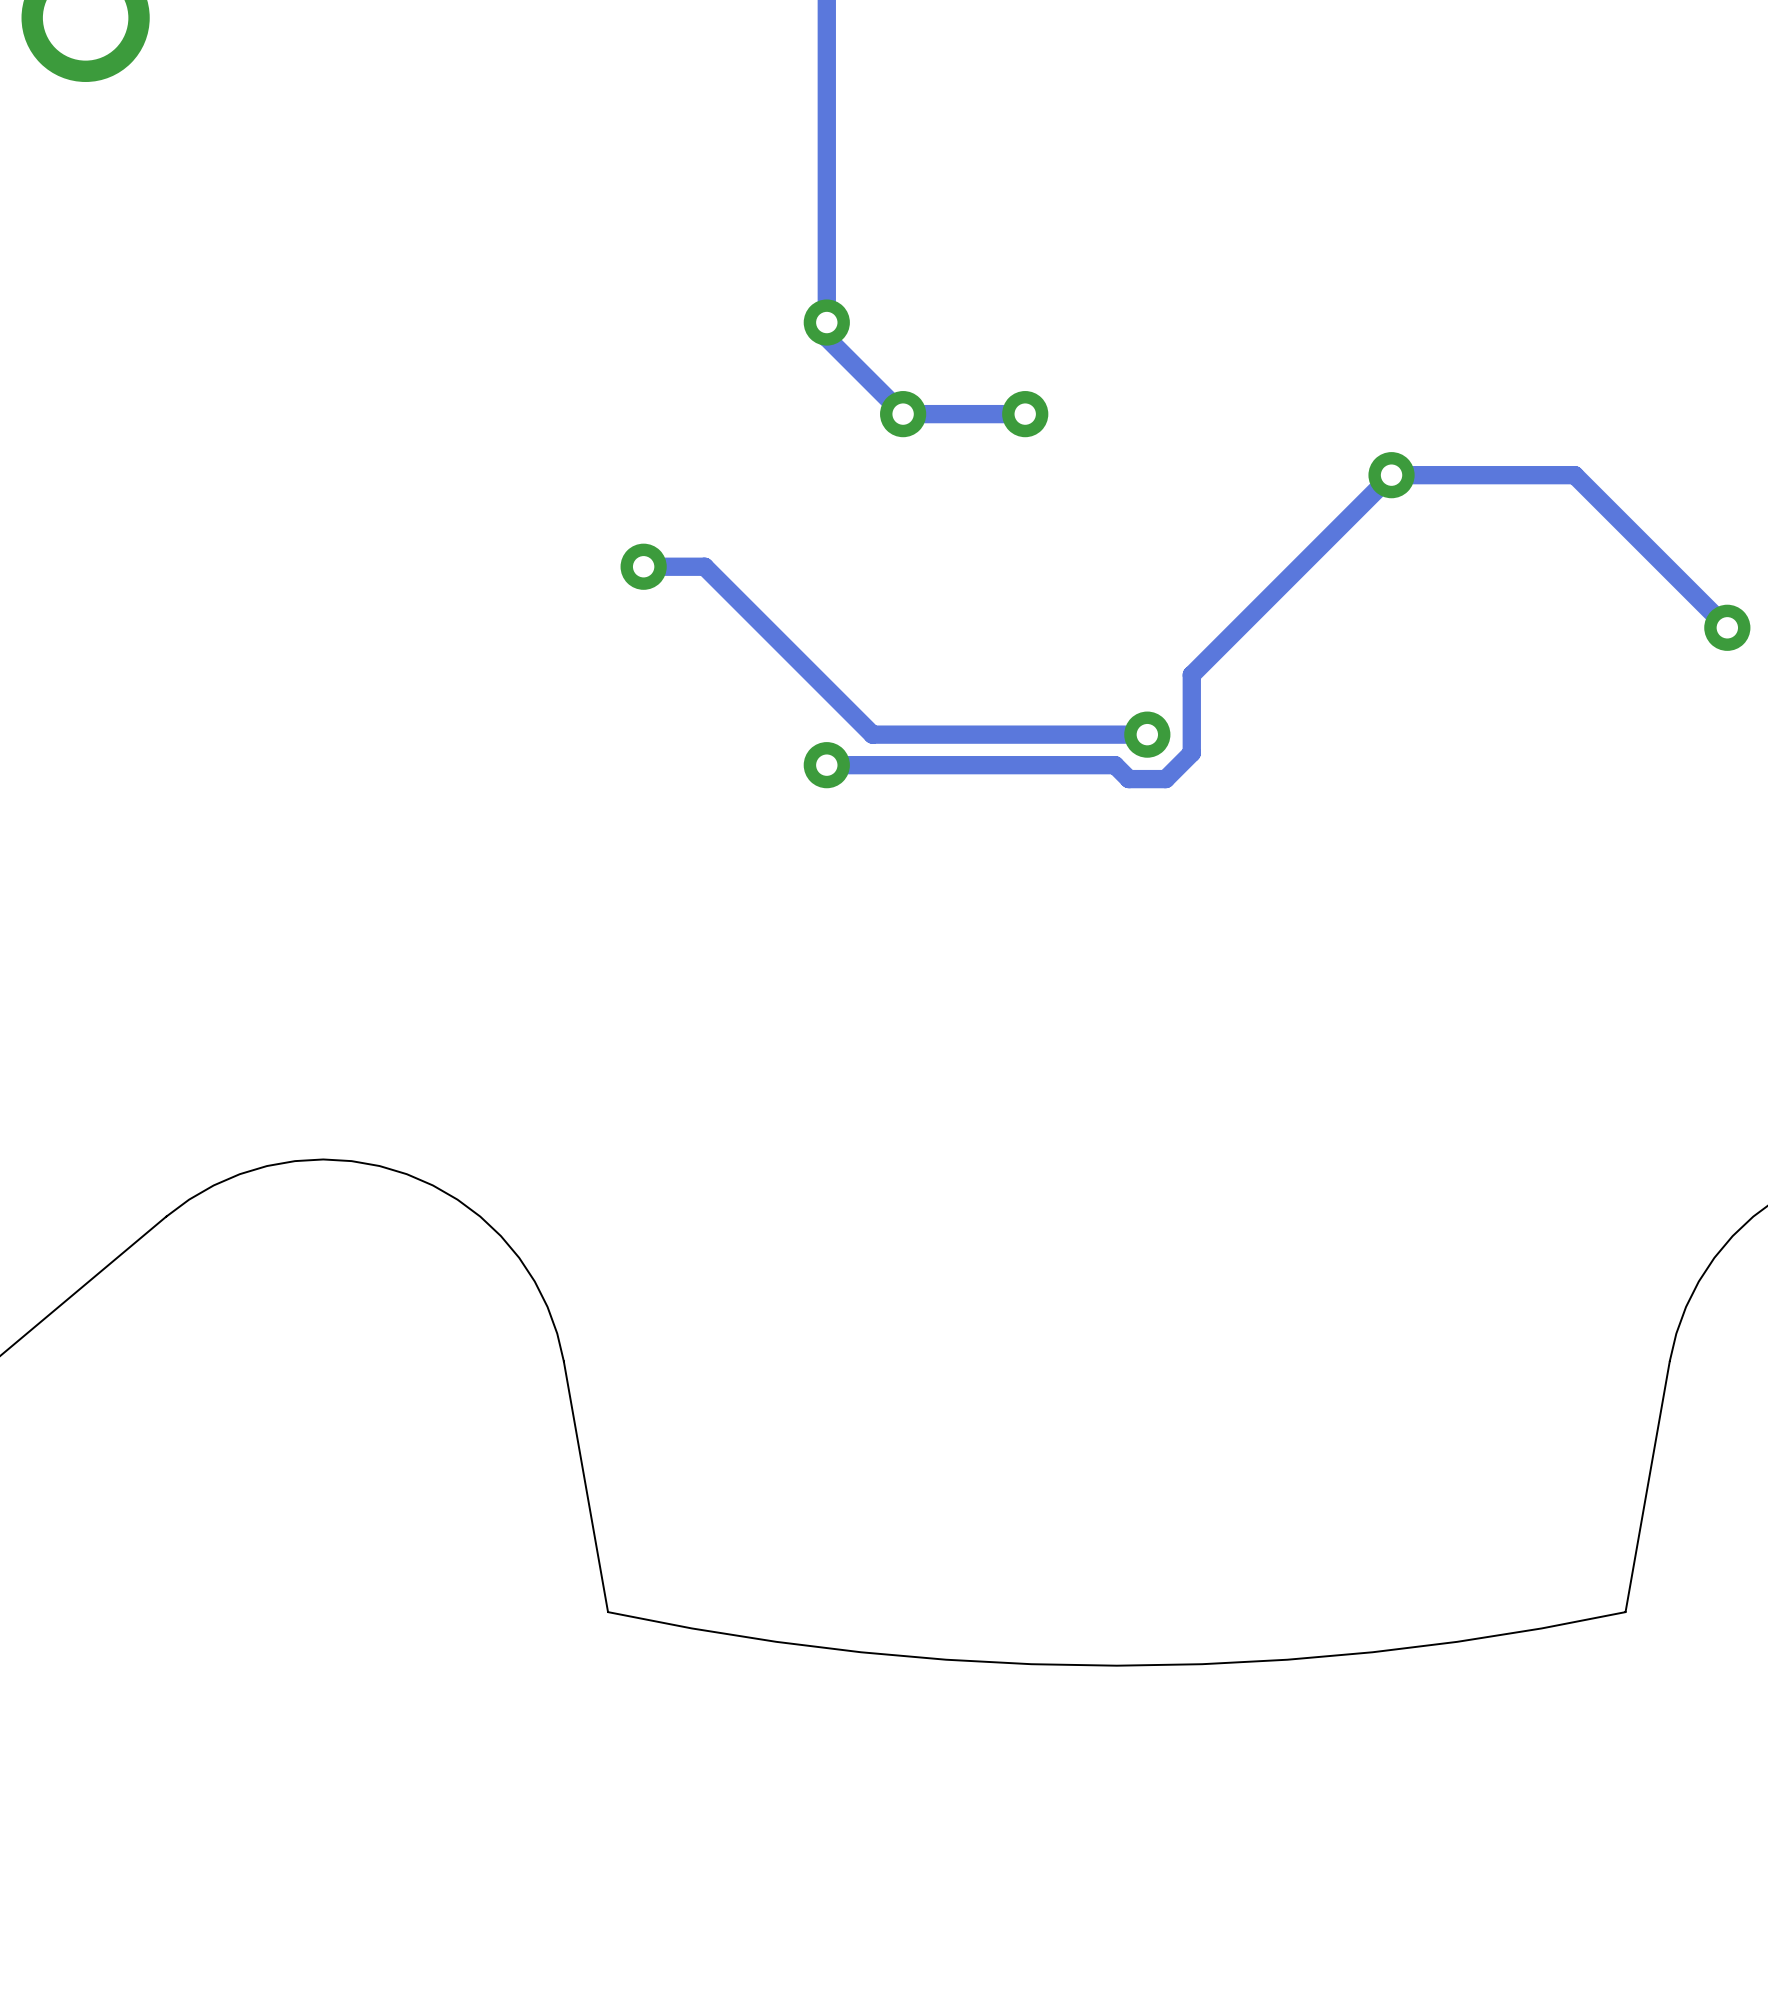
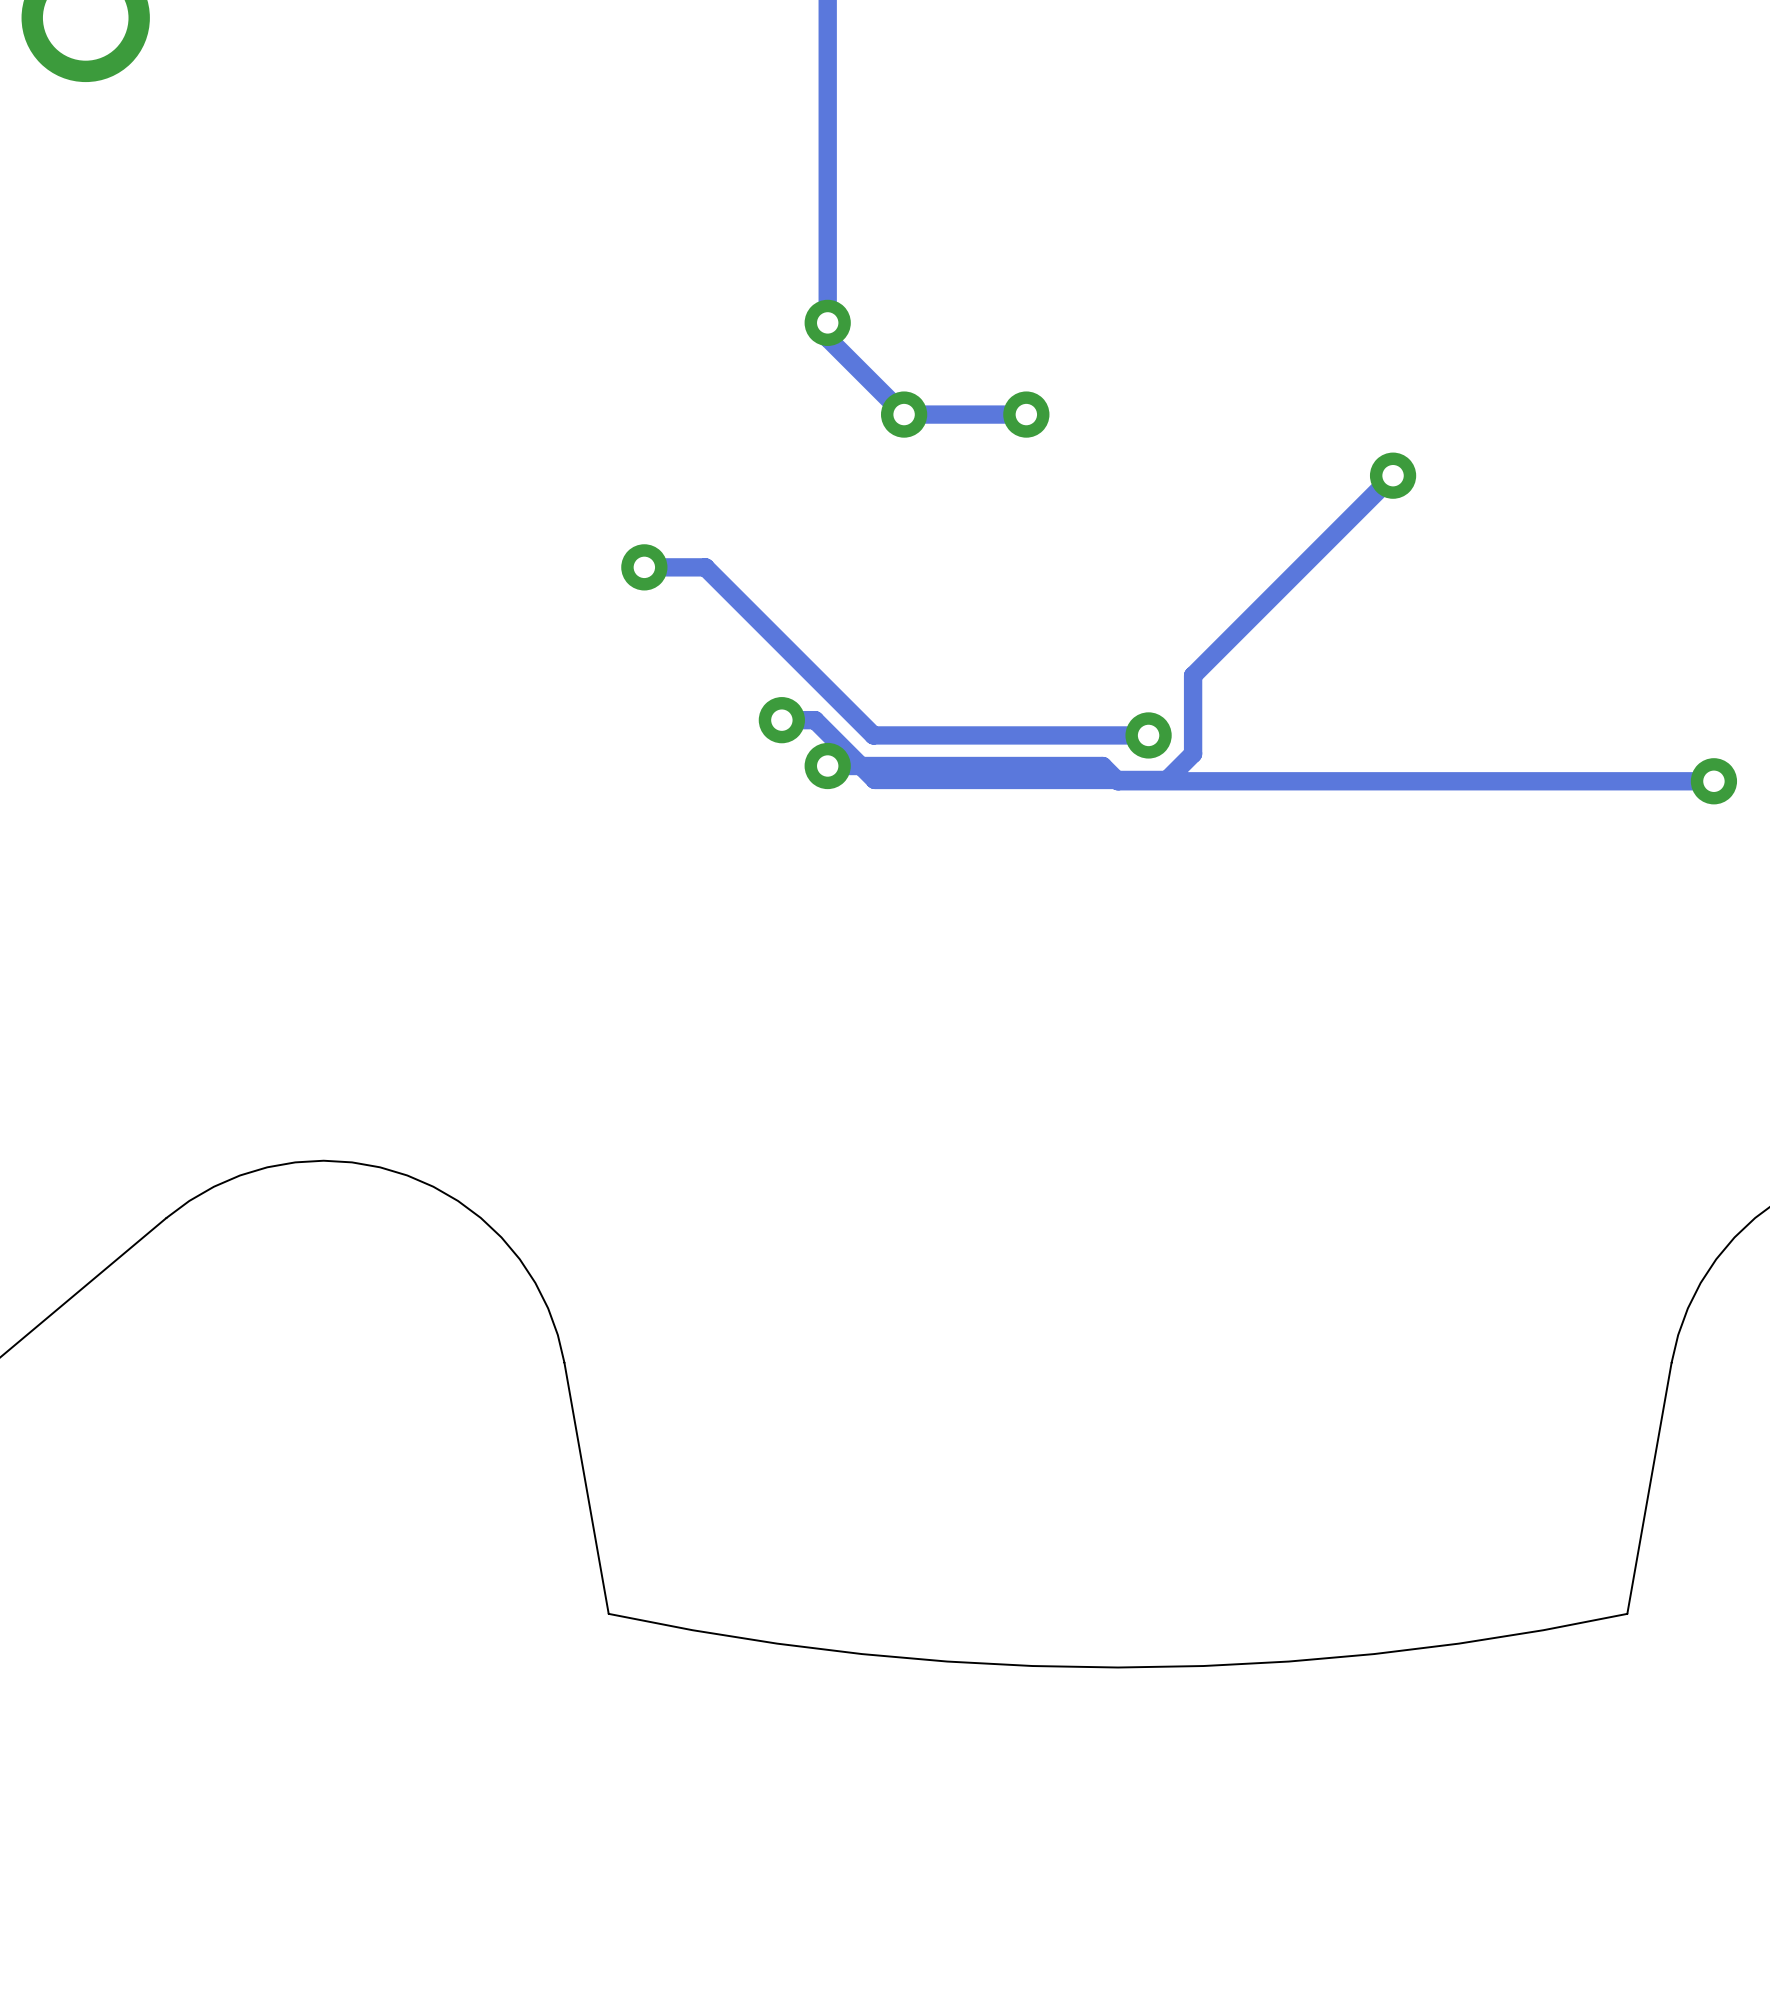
track: (1391, 475) (1574, 475) (1727, 627) -> none
via position: (1727, 627) -> (1713, 781)
via: none -> (781, 720)
track: (1101, 765) (1114, 765) (1128, 779) -> (781, 720) (815, 720) (874, 779) (1130, 779)
track: none -> (1102, 766) (1118, 781) (1713, 781)

